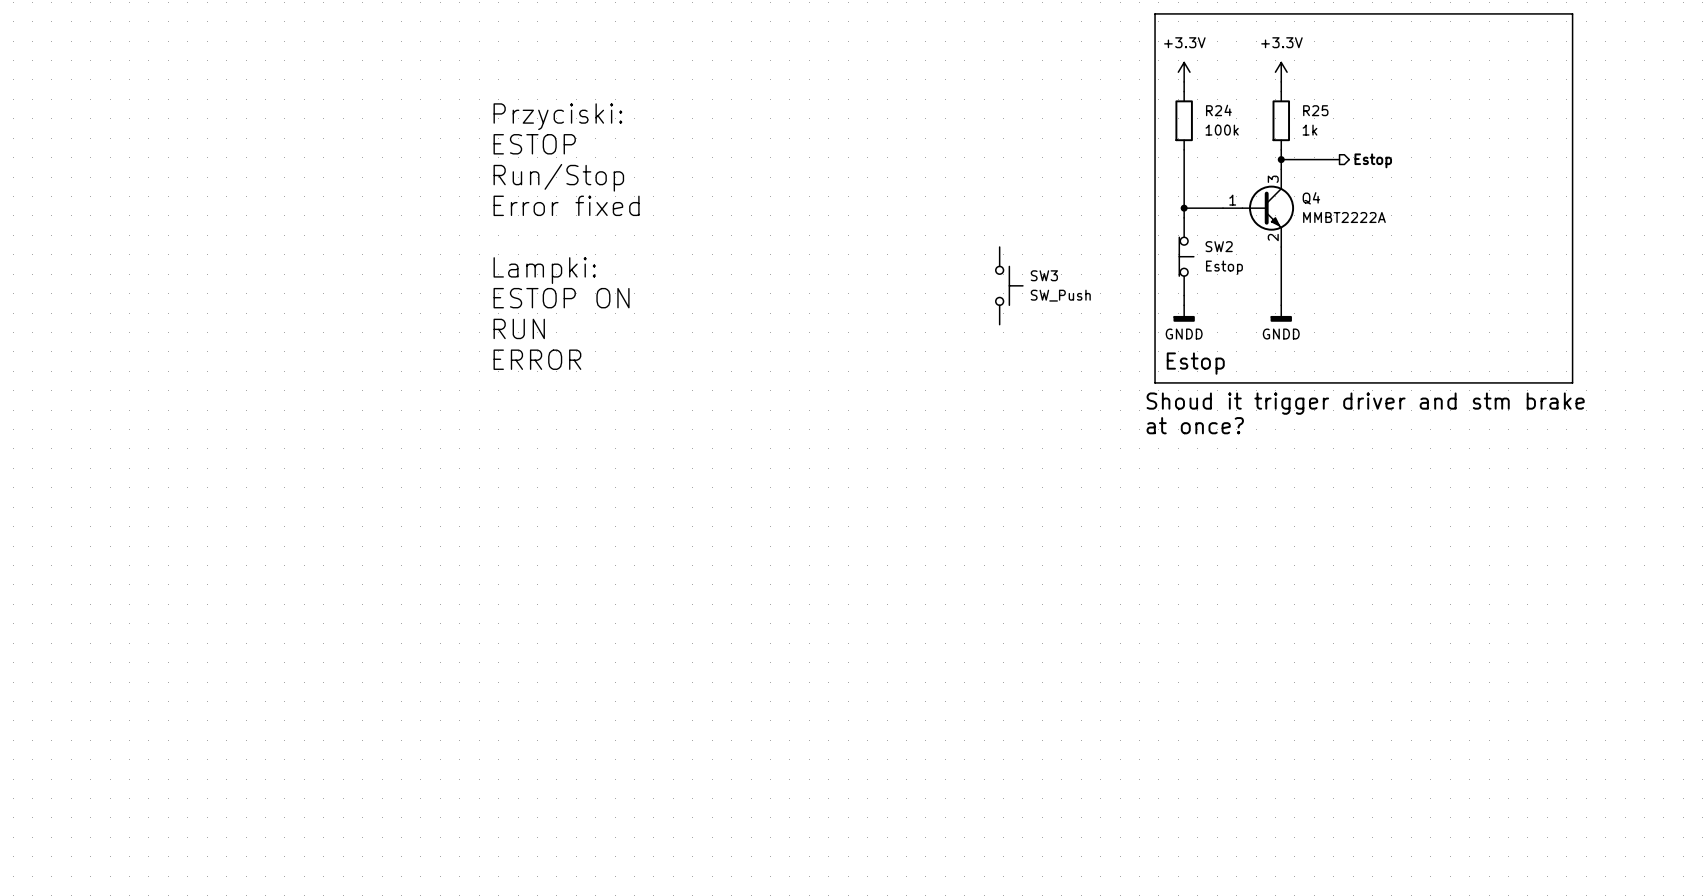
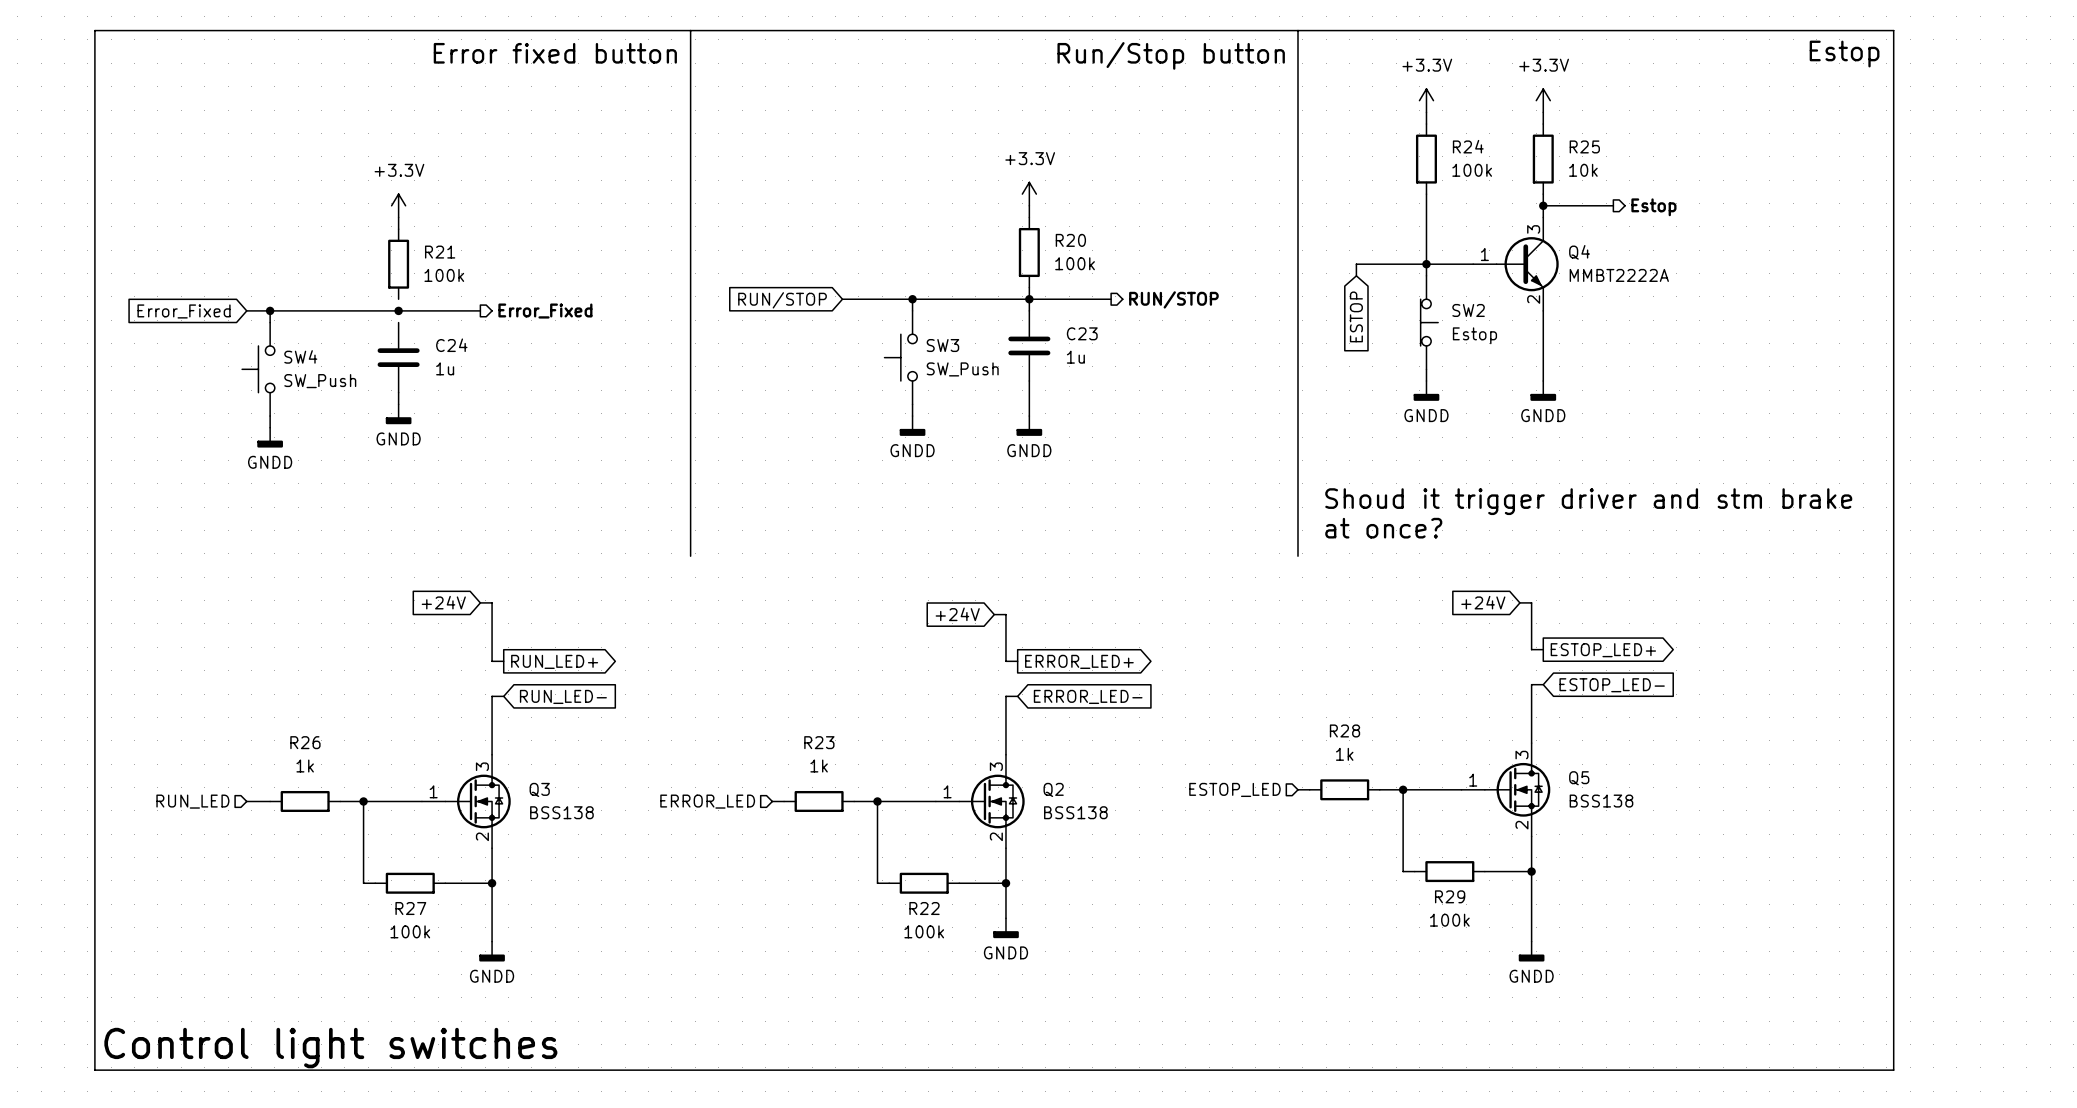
line: none -> (690, 30) (690, 556)
line: none -> (1297, 30) (1297, 556)
line: (1155, 13) (1155, 382) (1572, 382) -> (1391, 30) (94, 30) (94, 1070) (1893, 1070) (1893, 474)
text: none -> Error fixed button (555, 53)
text: none -> Estop (1844, 54)
text: none -> Run/Stop button (1171, 55)
text: Przyciski: (557, 116) -> none
R25 value: 1k (1310, 130) -> 10k (1583, 170)
text: ESTOP (534, 144) -> none
power symbol: none -> +3.3V (1029, 194)
power symbol: none -> +3.3V (398, 205)
wire: none -> (1029, 205) (1029, 217)
wire: none -> (398, 217) (398, 229)
text: Run/Stop (558, 177) -> none
R20: none -> 100k (1029, 252)
text: Error fixed (566, 205) -> none
R21: none -> 100k (398, 264)
wire: none -> (1426, 264) (1356, 264) (1356, 275)
wire: none -> (1029, 287) (1029, 310)
wire: none -> (842, 299) (1111, 299)
wire: none -> (912, 299) (912, 310)
junction: none -> (912, 299)
junction: none -> (1029, 299)
hierarchical label: none -> RUN/STOP (1173, 299)
global label: none -> RUN/STOP (782, 300)
global label: none -> Error_Fixed (184, 311)
wire: none -> (246, 310) (480, 310)
wire: none -> (270, 310) (270, 322)
junction: none -> (270, 310)
junction: none -> (398, 310)
hierarchical label: none -> Error_Fixed (545, 311)
global label: none -> ESTOP (1356, 316)
text: Lampki: (544, 270) -> none
C23: none -> 1u (1029, 345)
C24: none -> 1u (398, 357)
SW3 rotation: 0° (1009, 285) -> 180° (900, 357)
SW3 position: (1009, 285) -> (900, 357)
SW4: none -> SW_Push (258, 369)
text: ESTOP ON (561, 298) -> none
wire: none -> (1029, 380) (1029, 416)
wire: none -> (398, 392) (398, 404)
wire: none -> (912, 404) (912, 416)
text: RUN (519, 328) -> none
power symbol: none -> GNDD (398, 414)
wire: none -> (270, 416) (270, 427)
power symbol: none -> GNDD (912, 425)
power symbol: none -> GNDD (1029, 425)
power symbol: none -> GNDD (270, 437)
text: ERROR (537, 359) -> none
text: Estop (1195, 363) -> none
text position: Shoud it trigger driver and stm brake (1365, 403) -> Shoud it trigger driver and stm brake (1588, 501)
text position: at once? (1195, 425) -> at once? (1383, 528)
global label: none -> +24V (443, 602)
wire: none -> (480, 602) (492, 602) (492, 661) (503, 661)
global label: none -> +24V (1483, 602)
wire: none -> (1519, 602) (1531, 602) (1531, 649) (1543, 649)
global label: none -> +24V (957, 614)
wire: none -> (994, 614) (1005, 614) (1005, 661) (1017, 661)
global label: none -> ESTOP_LED+ (1603, 650)
global label: none -> RUN_LED+ (554, 661)
global label: none -> ERROR_LED+ (1079, 661)
wire: none -> (1543, 684) (1531, 684) (1531, 743)
global label: none -> ESTOP_LED- (1612, 685)
wire: none -> (503, 696) (492, 696) (492, 754)
global label: none -> RUN_LED- (563, 696)
wire: none -> (1017, 696) (1005, 696) (1005, 754)
global label: none -> ERROR_LED- (1088, 696)
hierarchical label: none -> ESTOP_LED (1234, 789)
wire: none -> (1297, 789) (1309, 789)
R28: none -> 1k (1344, 789)
wire: none -> (1379, 789) (1461, 789)
wire: none -> (1403, 789) (1403, 871) (1414, 871)
junction: none -> (1403, 789)
Q5: none -> BSS138 (1505, 789)
hierarchical label: none -> RUN_LED (192, 801)
wire: none -> (246, 801) (270, 801)
R26: none -> 1k (305, 801)
wire: none -> (340, 801) (421, 801)
wire: none -> (363, 801) (363, 883) (375, 883)
junction: none -> (363, 801)
Q3: none -> BSS138 (466, 801)
hierarchical label: none -> ERROR_LED (707, 801)
wire: none -> (772, 801) (784, 801)
R23: none -> 1k (819, 801)
wire: none -> (854, 801) (935, 801)
wire: none -> (877, 801) (877, 883) (889, 883)
junction: none -> (877, 801)
Q2: none -> BSS138 (980, 801)
wire: none -> (1531, 836) (1531, 941)
wire: none -> (492, 848) (492, 941)
wire: none -> (1005, 848) (1005, 918)
R29: none -> 100k (1449, 871)
wire: none -> (1484, 871) (1531, 871)
junction: none -> (1531, 871)
R27: none -> 100k (410, 883)
wire: none -> (445, 883) (492, 883)
junction: none -> (492, 883)
R22: none -> 100k (924, 883)
wire: none -> (959, 883) (1005, 883)
junction: none -> (1005, 883)
power symbol: none -> GNDD (1005, 928)
power symbol: none -> GNDD (492, 951)
power symbol: none -> GNDD (1531, 951)
text: none -> Control light switches (330, 1048)

